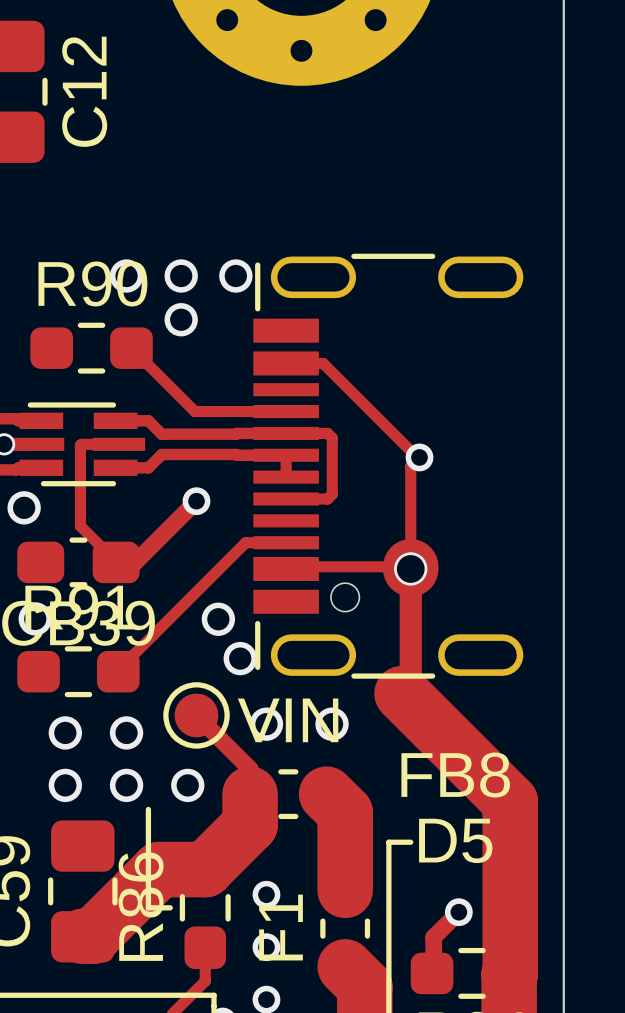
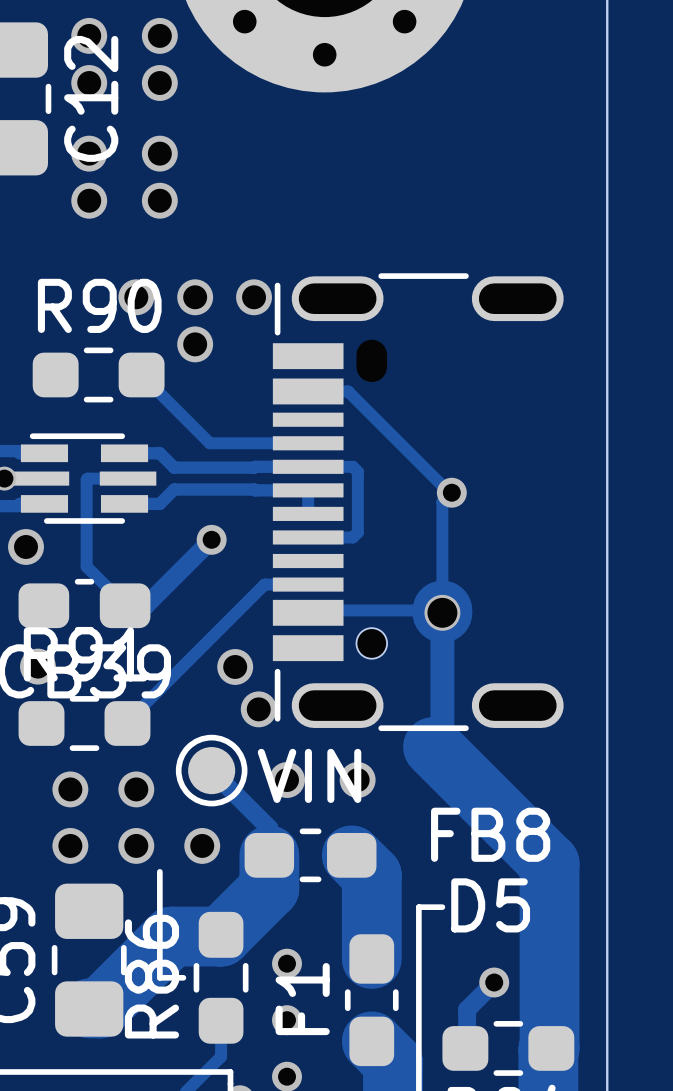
via: none -> (89, 35)
via: none -> (159, 35)
via: none -> (89, 83)
via: none -> (159, 83)
via: none -> (89, 153)
via: none -> (159, 153)
via: none -> (89, 200)
via: none -> (159, 200)

